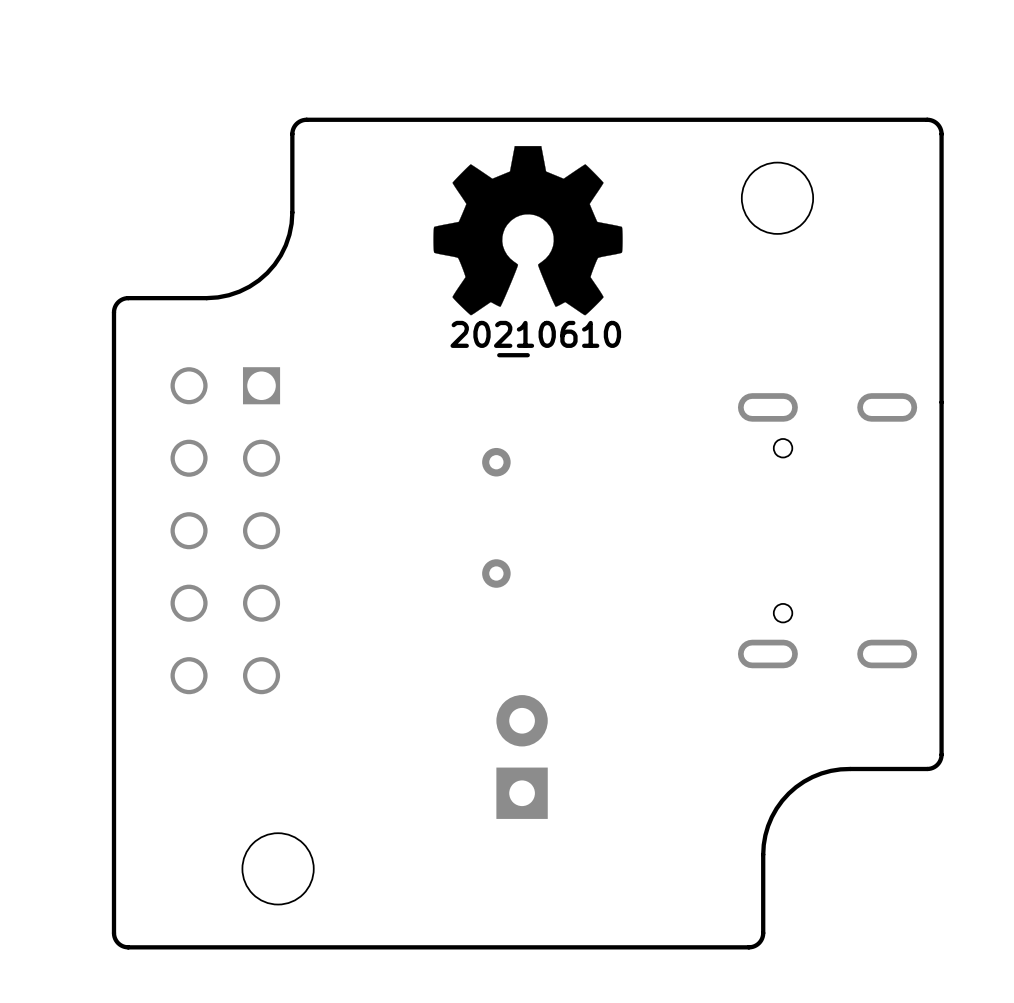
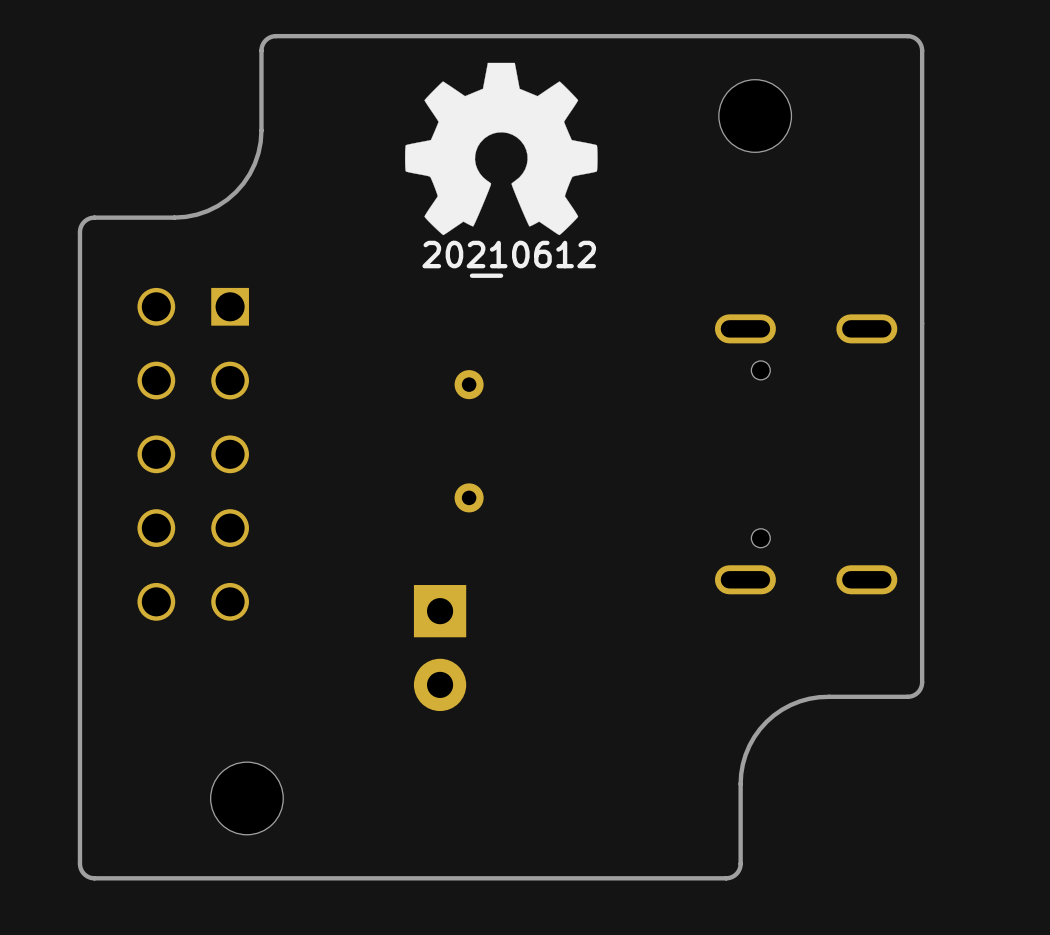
drawing shape: [450, 320, 622, 358] -> [422, 240, 597, 278]
part rotation: 0° (522, 757) -> 180° (440, 648)

